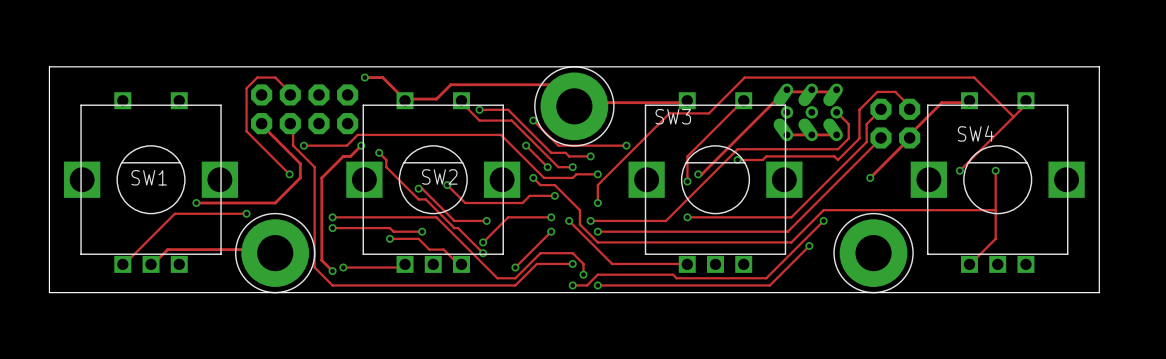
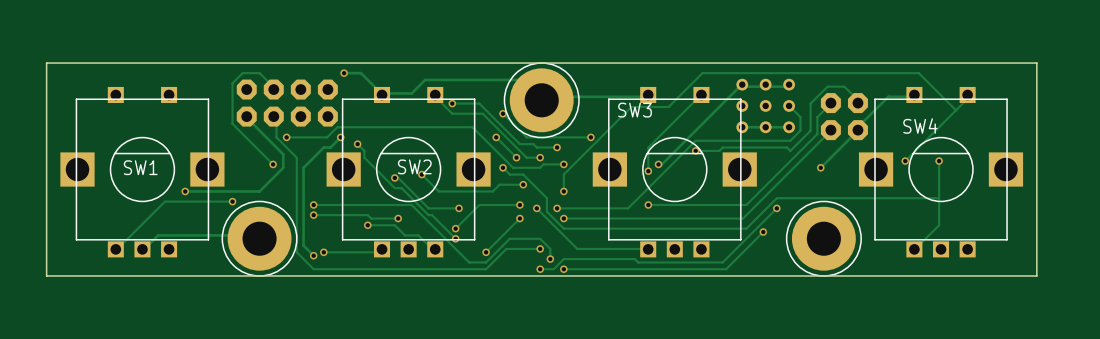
part footprint: [773, 83, 843, 142] -> [736, 78, 795, 134]

